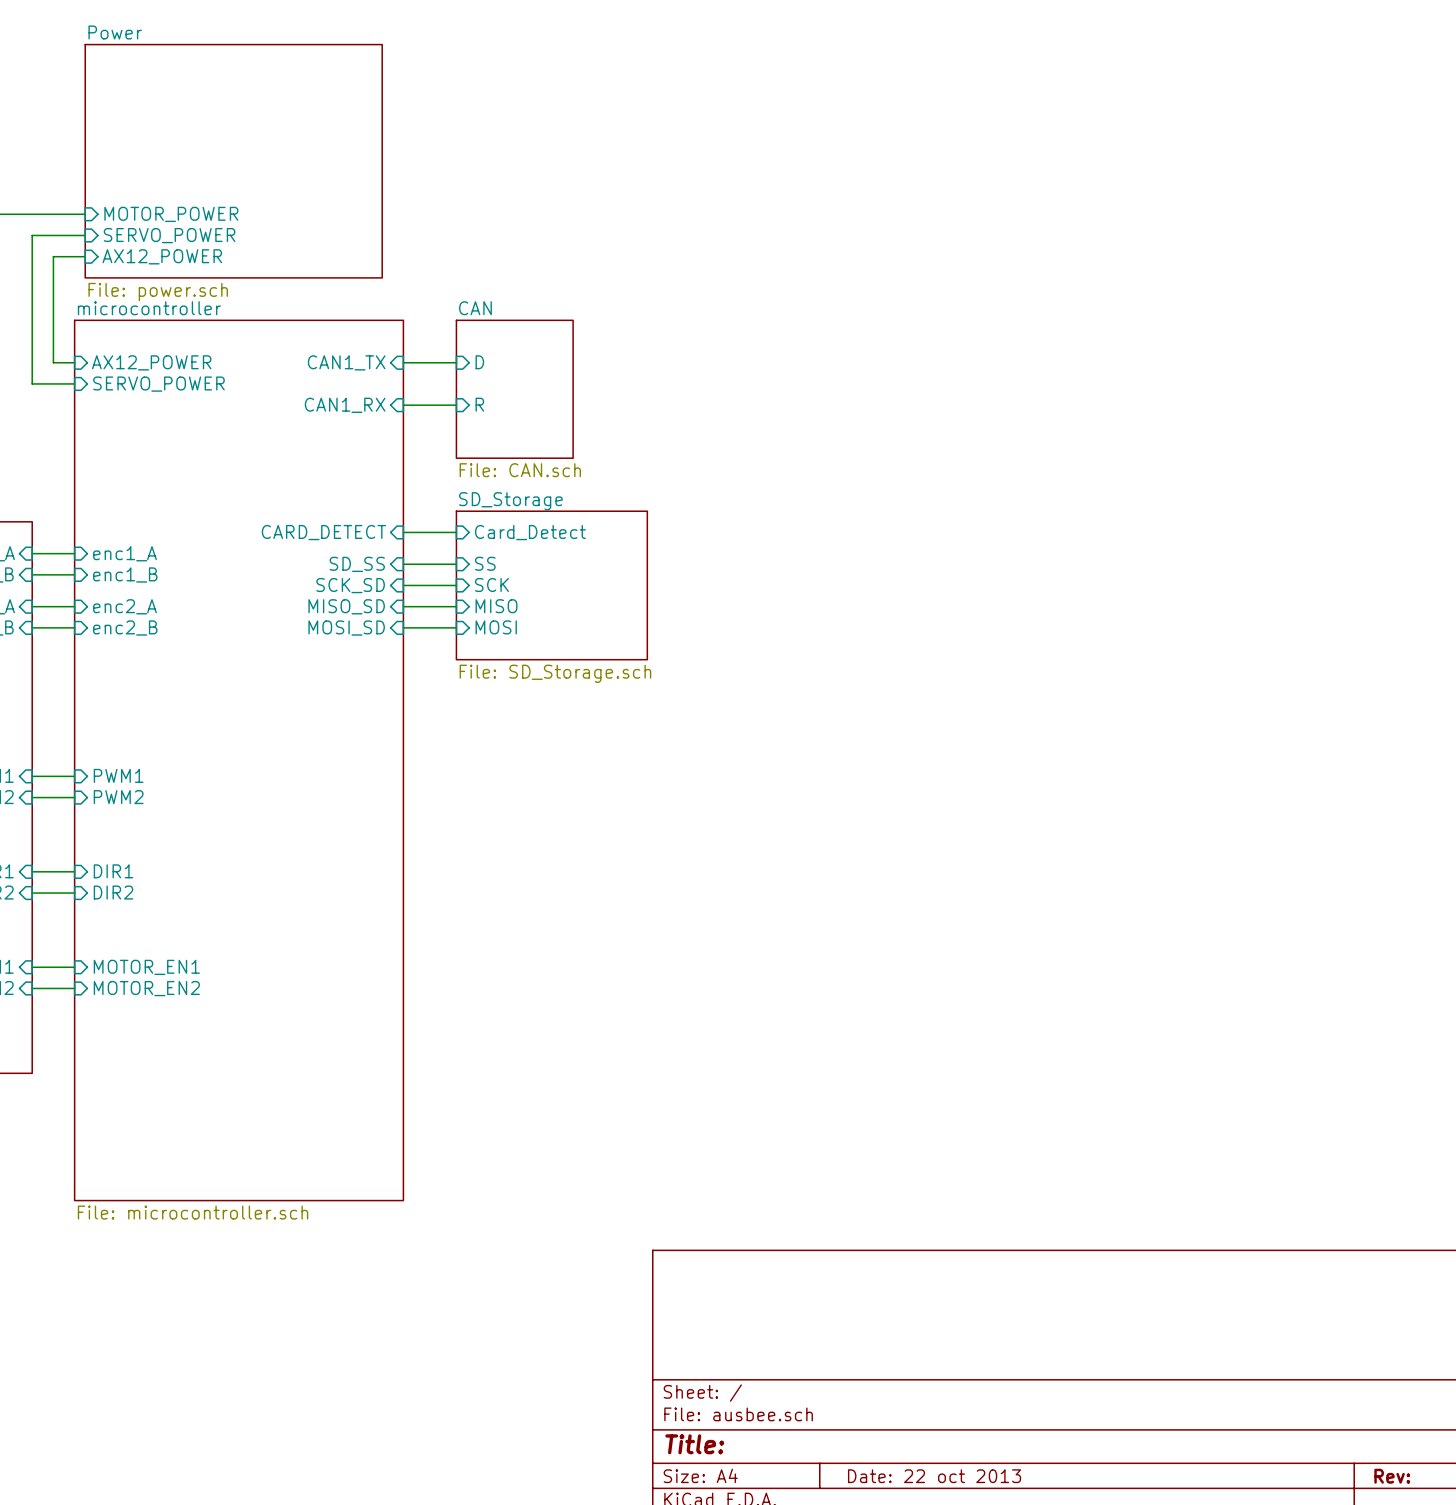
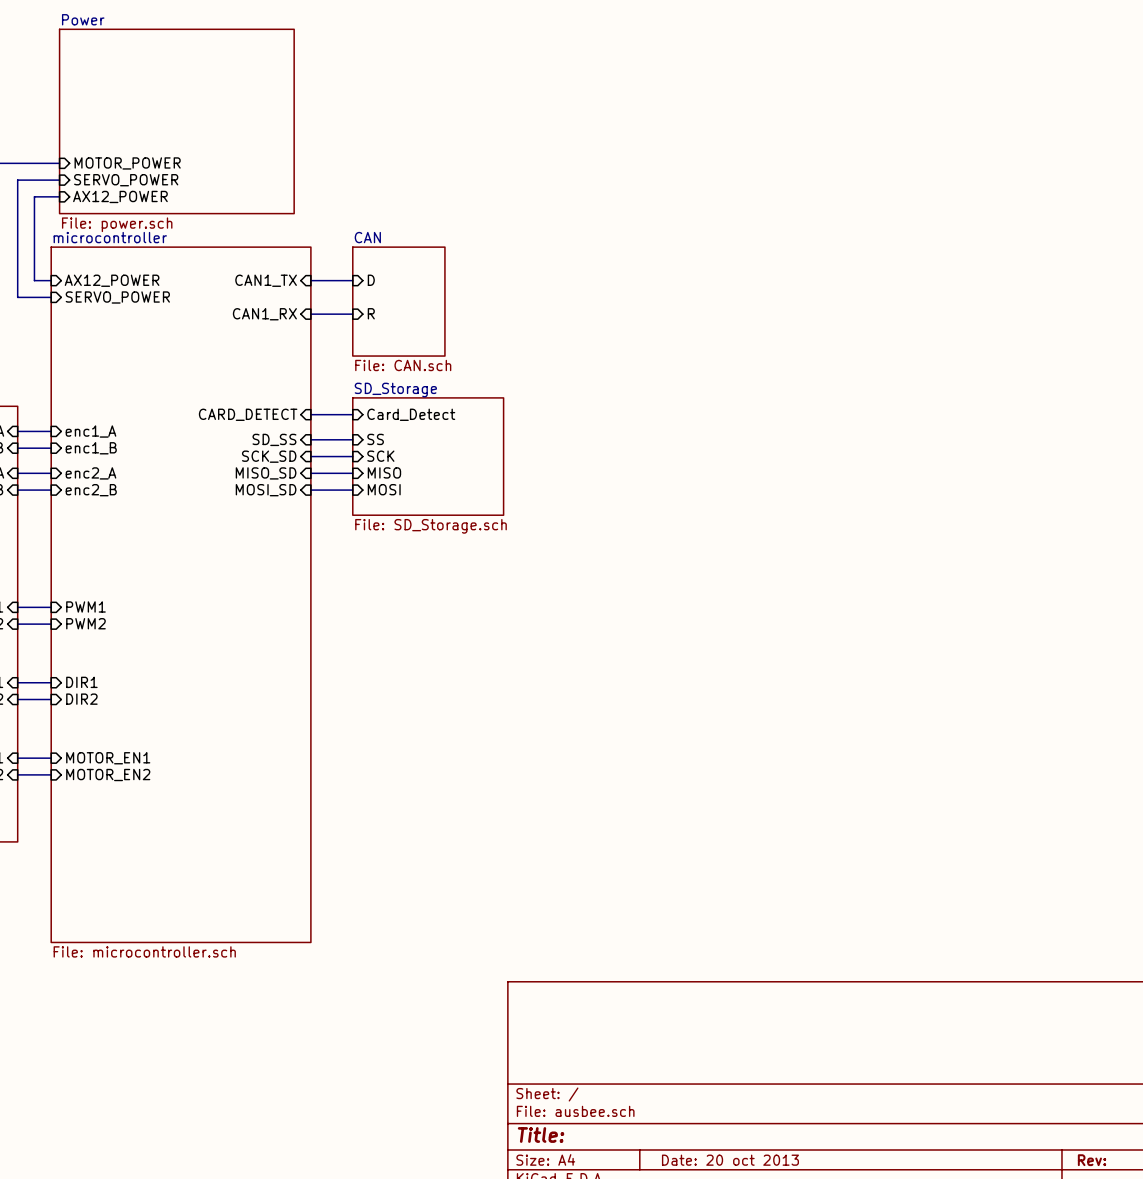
title block: Date: 22 oct 2013 (934, 1476) -> Date: 20 oct 2013 (730, 1160)

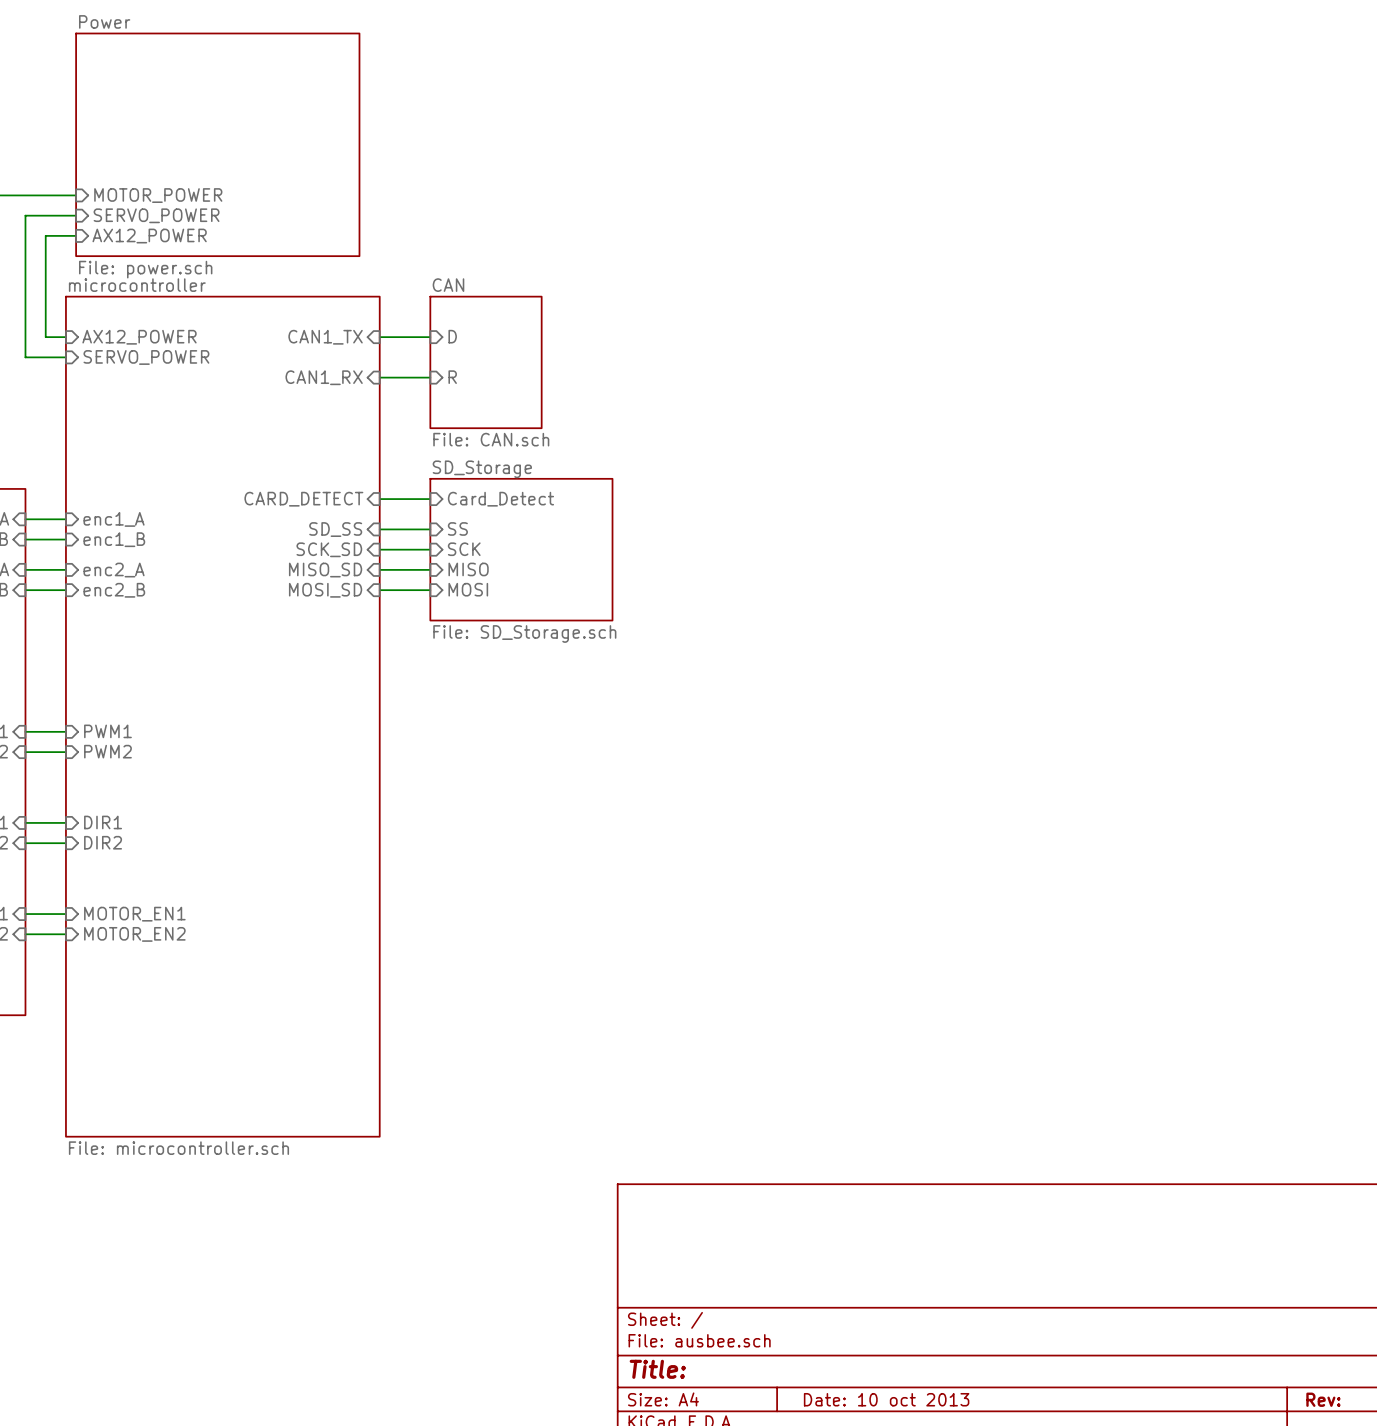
title block: Date: 20 oct 2013 (730, 1160) -> Date: 10 oct 2013 (886, 1399)

